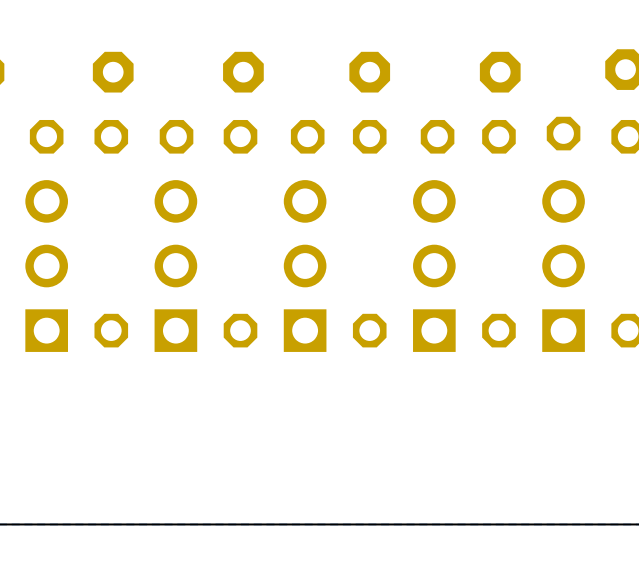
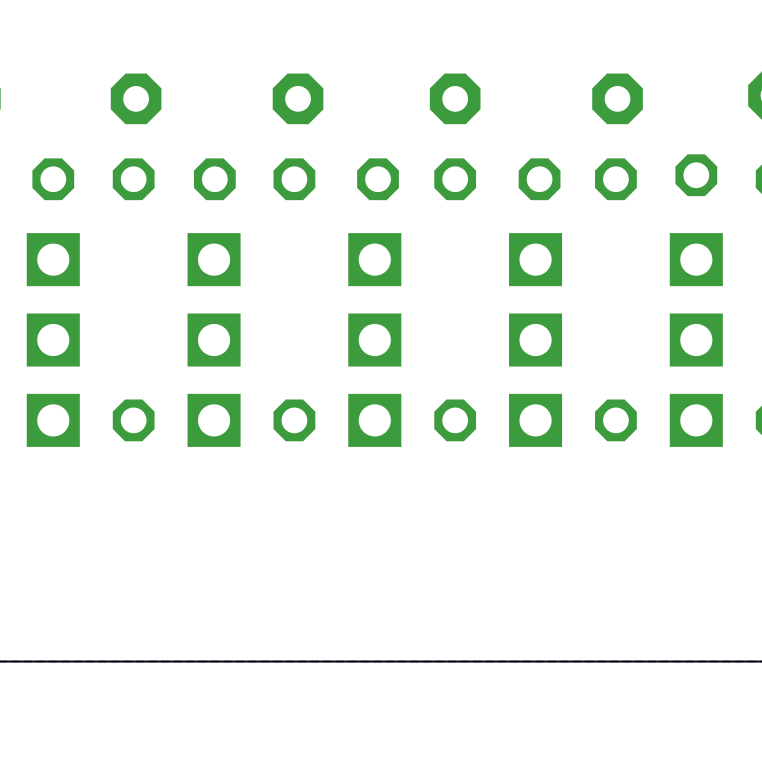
part footprint: [25, 180, 68, 352] -> [26, 233, 80, 447]
part footprint: [154, 180, 198, 352] -> [187, 233, 241, 447]
part footprint: [283, 180, 327, 352] -> [348, 233, 402, 447]
part footprint: [413, 180, 456, 352] -> [509, 233, 563, 447]
part footprint: [542, 180, 585, 352] -> [669, 233, 723, 447]

